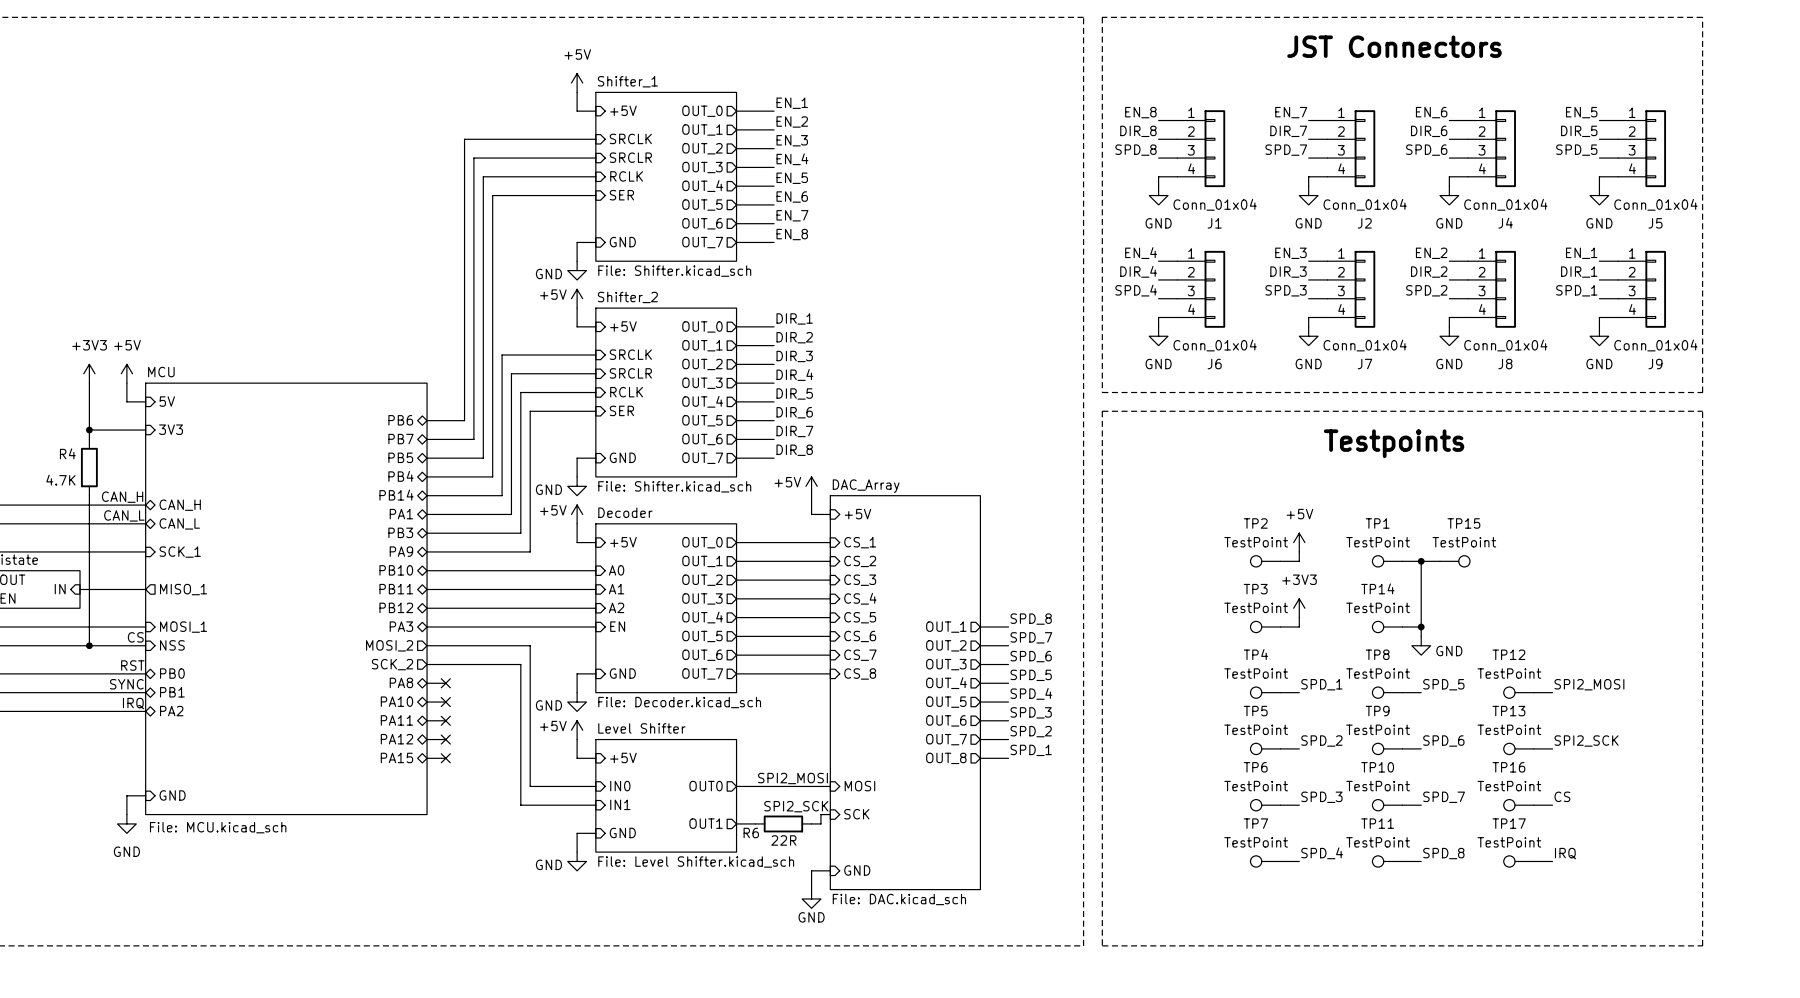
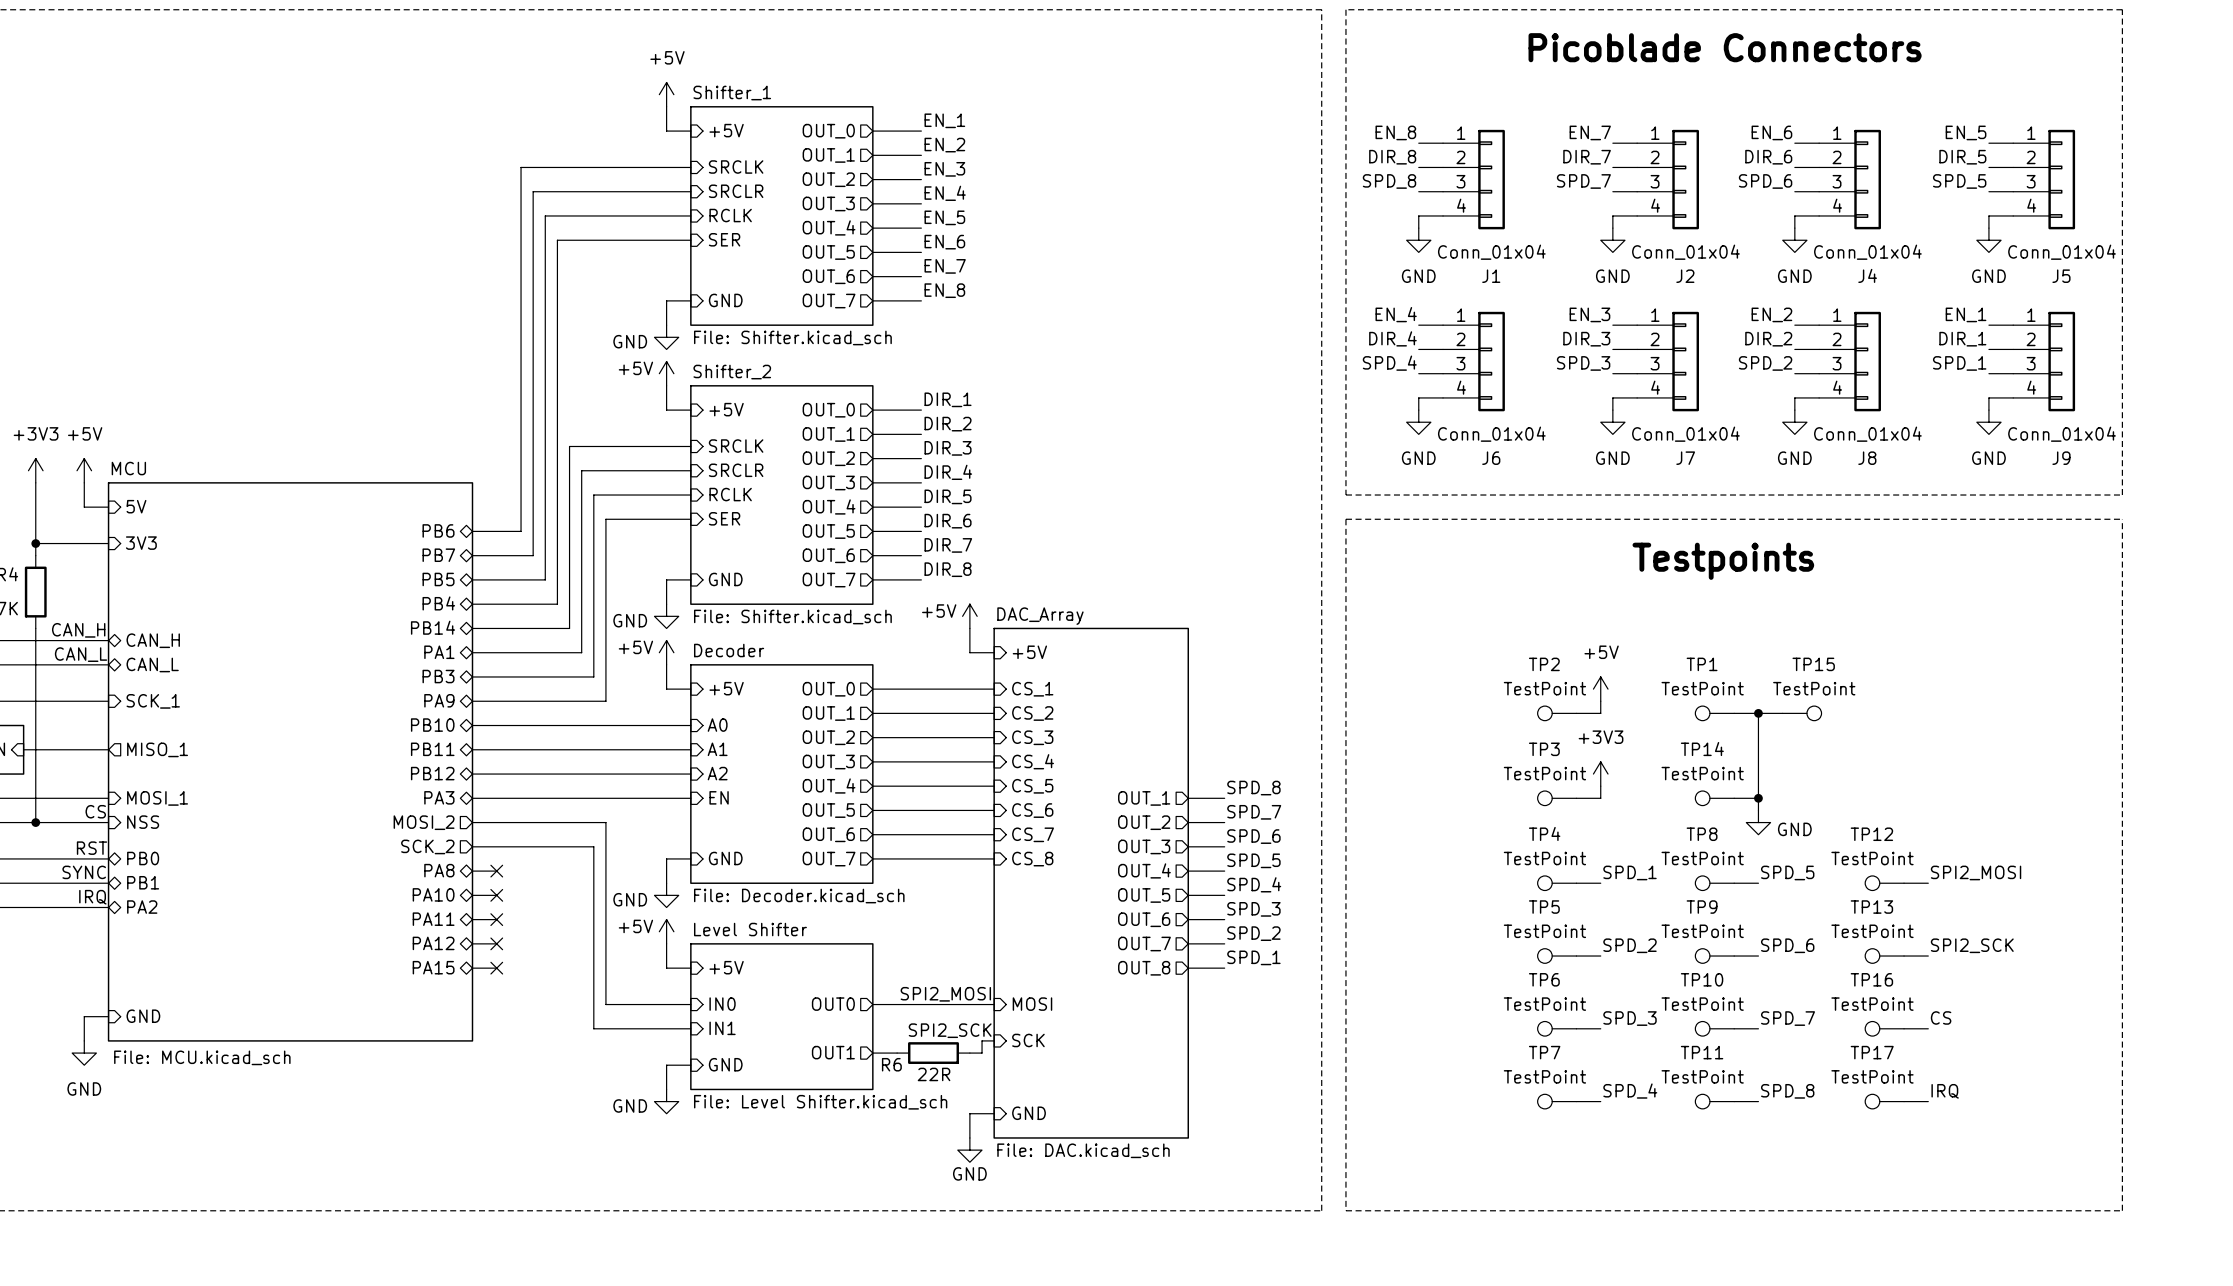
text: JST Connectors (1394, 46) -> Picoblade Connectors (1725, 47)

